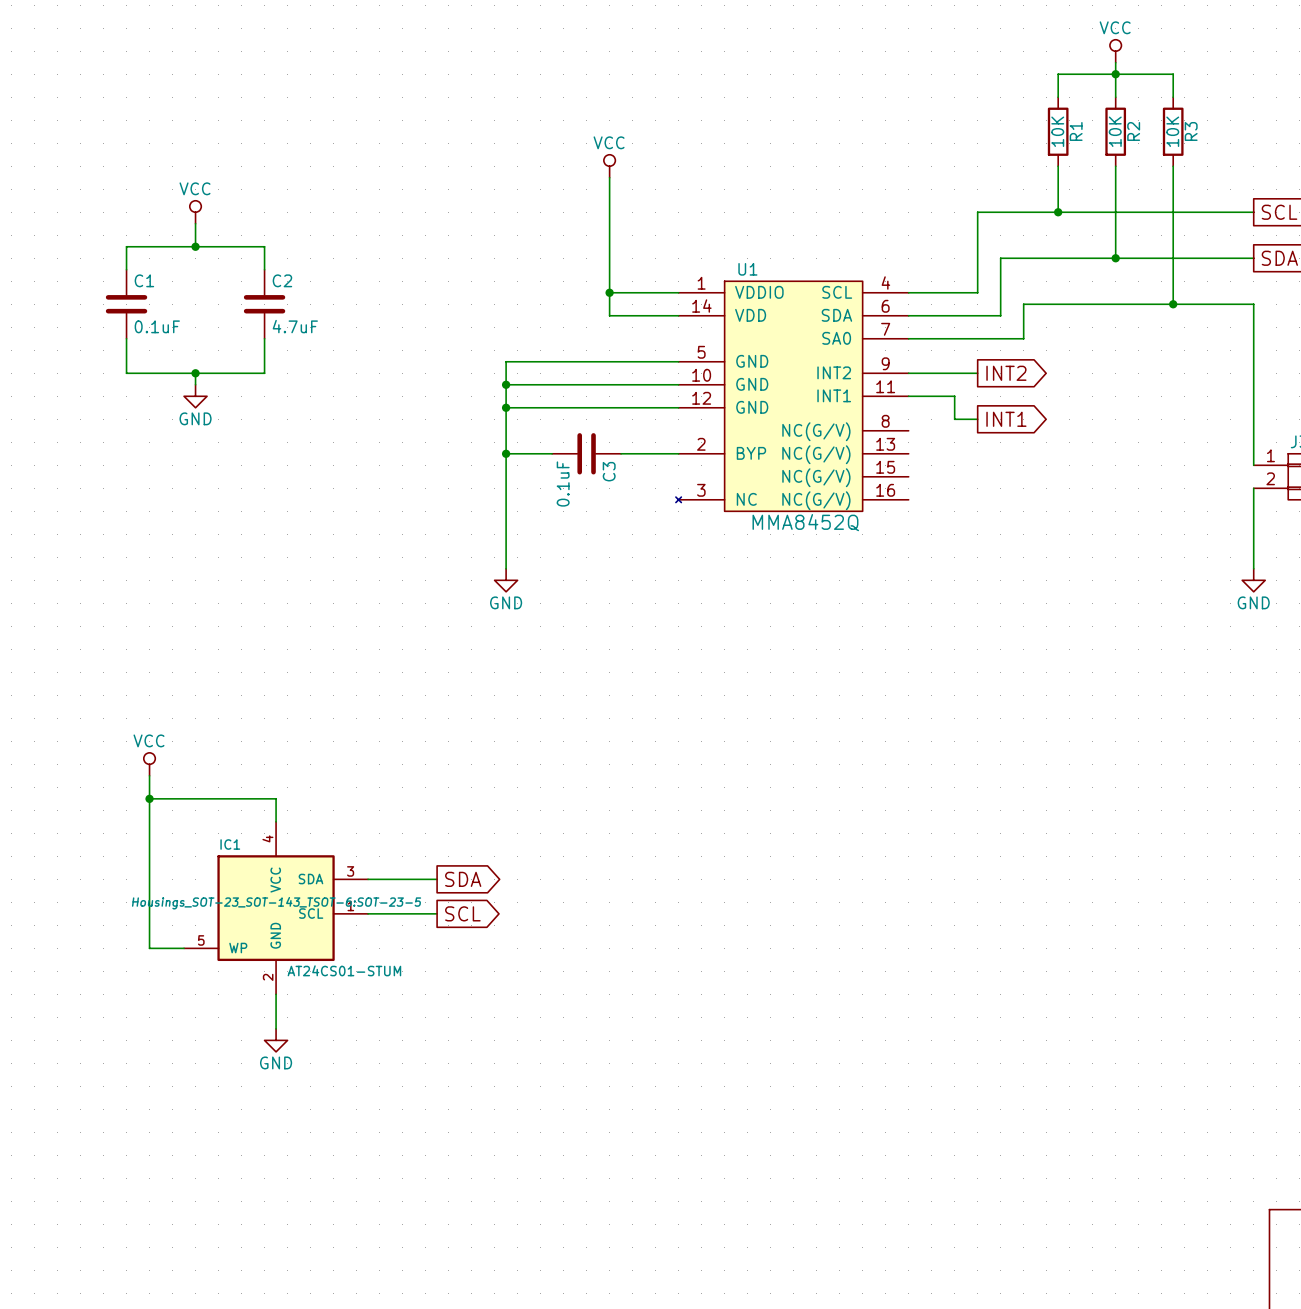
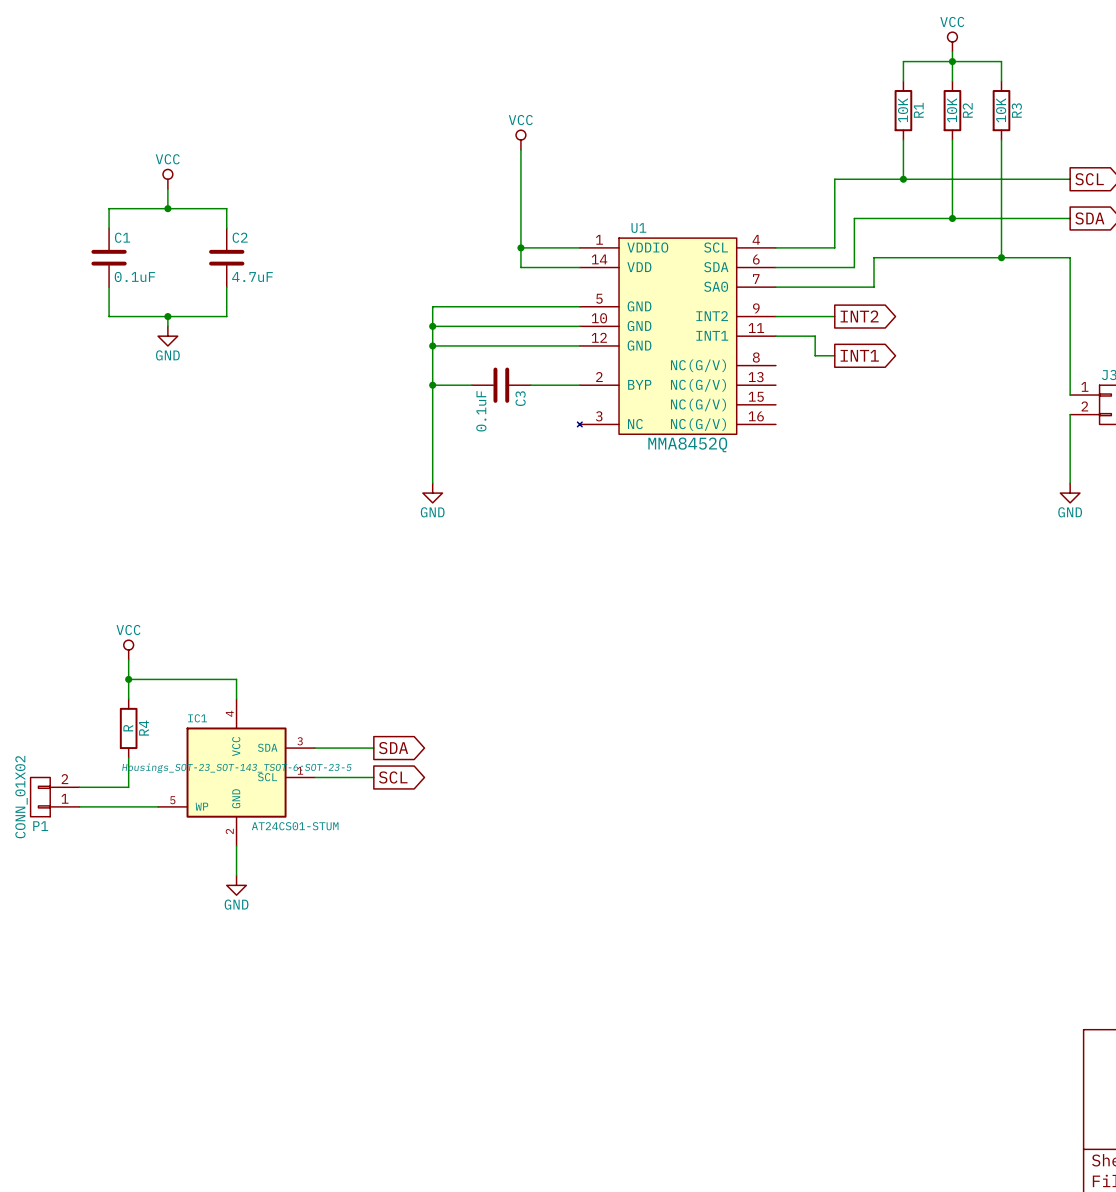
wire: (149, 821) (149, 890) -> none
R4: none -> R (128, 728)
wire: (149, 925) (149, 948) -> (128, 787) (79, 787)
P1: none -> CONN_01X02 (55, 797)
wire: none -> (79, 806) (128, 806)

